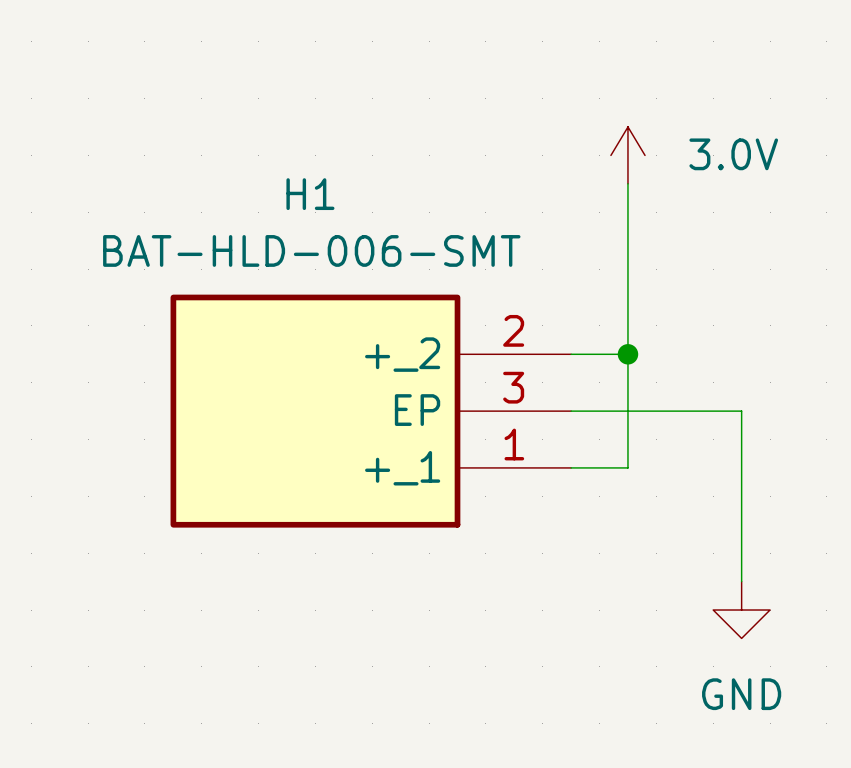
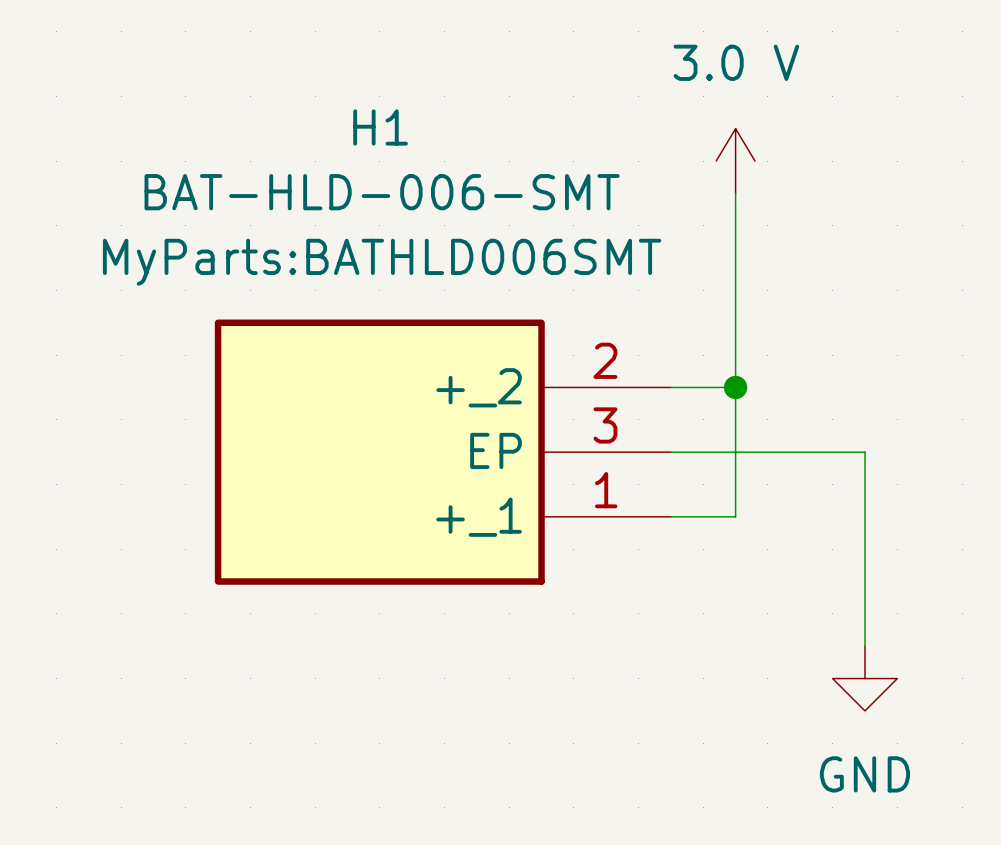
power symbol: 3.0V (627, 155) -> 3.0 V (735, 161)
H1 name position: H1 (310, 194) -> H1 (380, 127)
H1 text: none -> MyParts:BATHLD006SMT (382, 262)
H1 value position: BAT-HLD-006-SMT (311, 250) -> BAT-HLD-006-SMT (382, 192)

